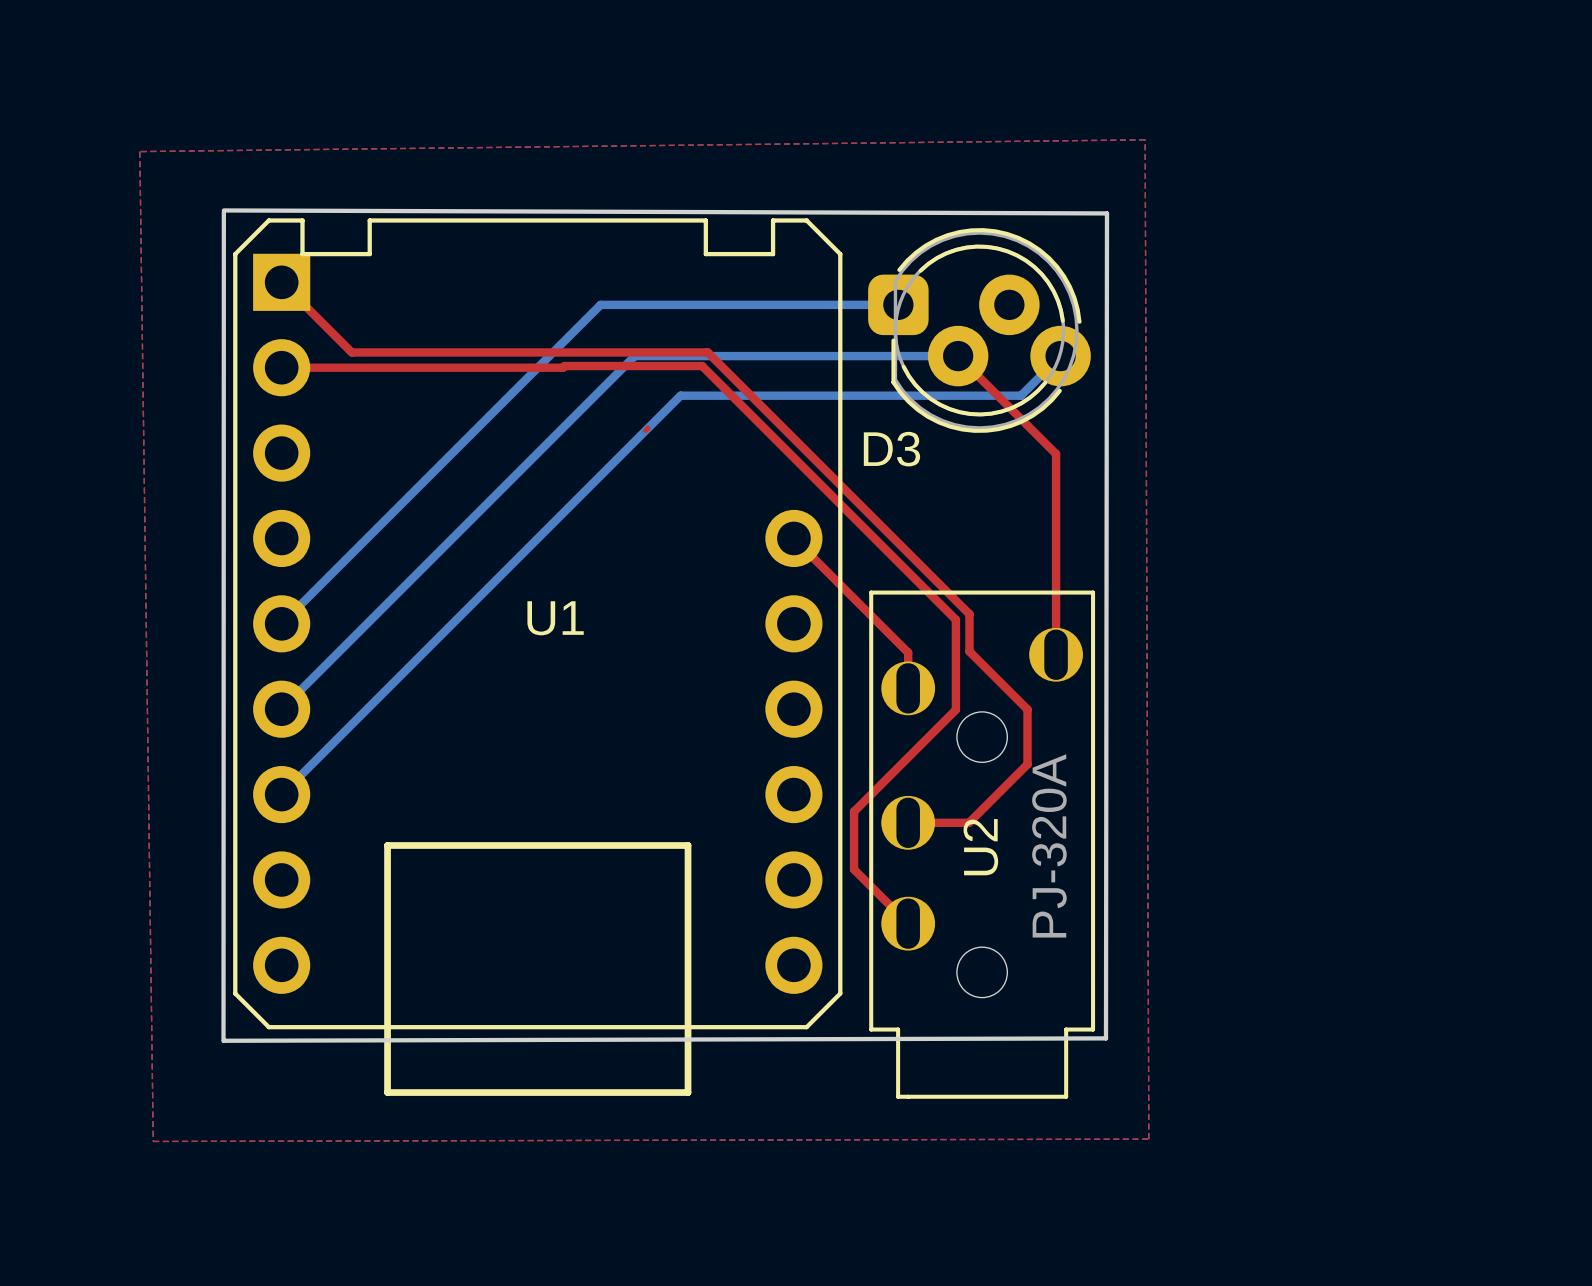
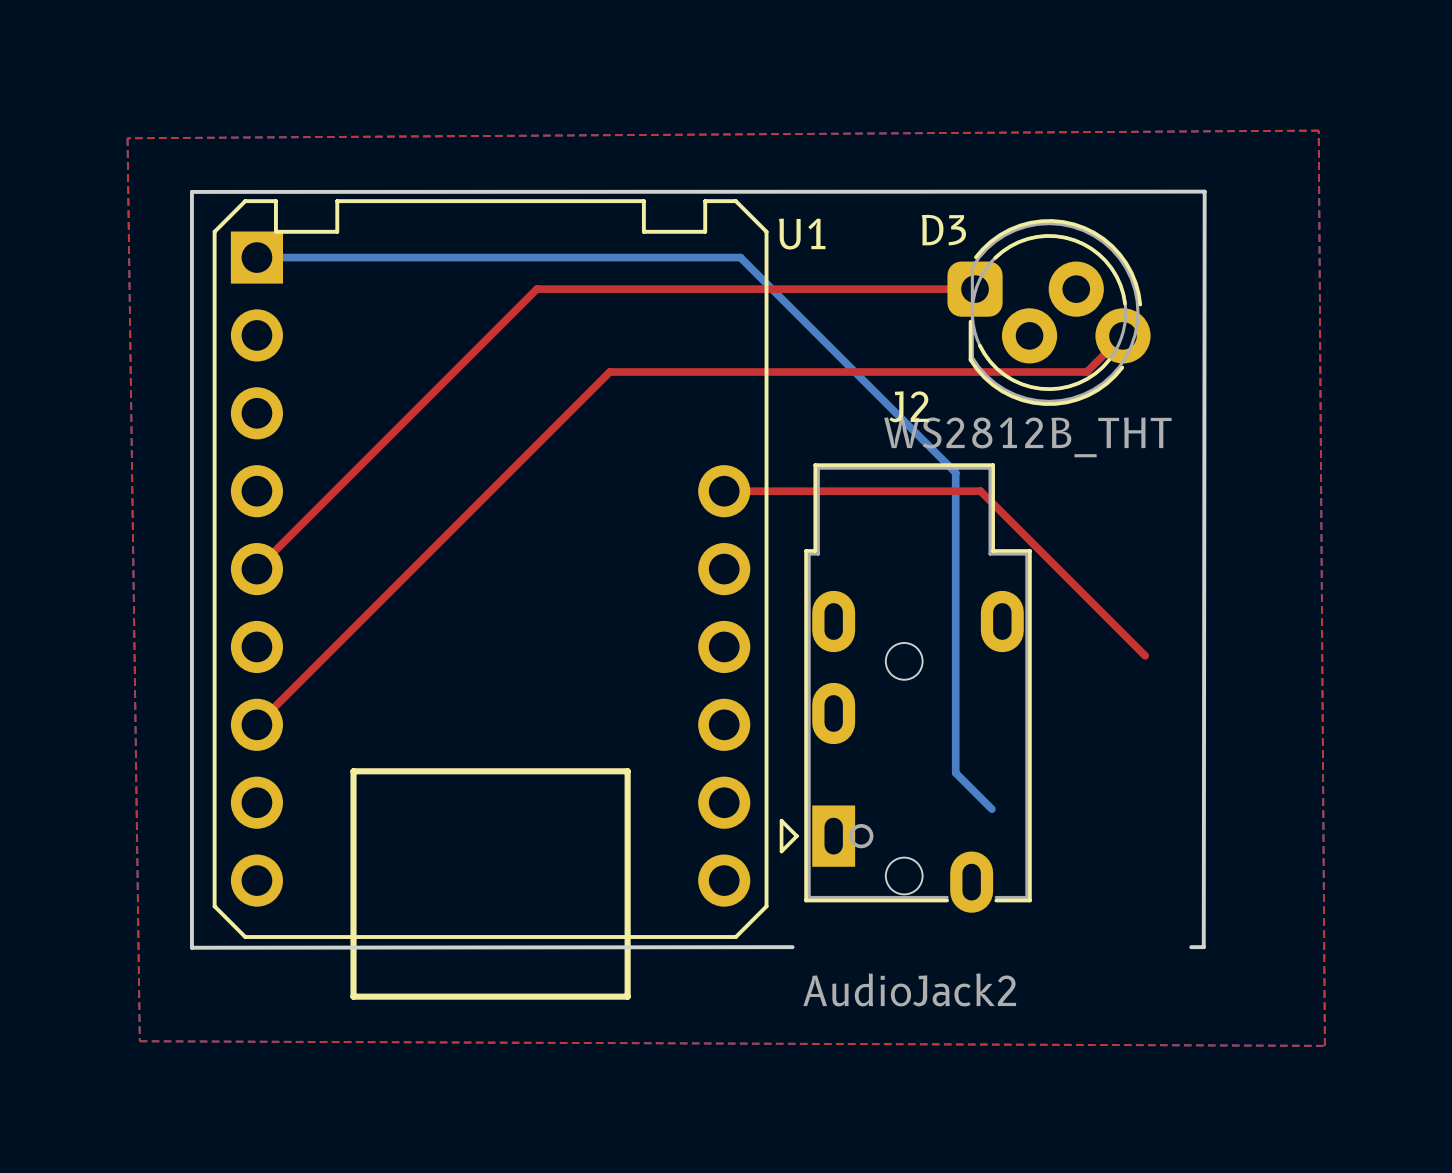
top zone outline: (139, 151) (1145, 139) (1148, 1139) (153, 1141) -> (127, 138) (1318, 130) (1324, 1045) (139, 1041)
board edge: (223, 210) (1107, 213) (1105, 1038) (223, 1040) -> none
board edge: (223, 212) (223, 1040) -> none
top track: (281, 282) (351, 352) (707, 352) (969, 614) (969, 651) (1027, 709) (1027, 764) (969, 822) (908, 822) -> none
bottom track: none -> (256, 257) (740, 257) (955, 472) (955, 772) (991, 809)
bottom track: (898, 304) (600, 304) (281, 623) -> none
top track: none -> (975, 289) (536, 289) (256, 569)
D3 position: (979, 330) -> (1049, 312)
top track: (958, 356) (1056, 454) (1056, 654) -> none
bottom track: (958, 356) (634, 356) (281, 709) -> none
bottom track: (1060, 356) (1020, 395) (680, 395) (281, 794) -> none
top track: (281, 367) (702, 366) (955, 619) (955, 709) (854, 811) (854, 869) (908, 923) -> none
top track: none -> (1123, 335) (1086, 371) (609, 371) (256, 724)
D3 name position: D3 (891, 449) -> D3 (943, 230)
D3 value: none -> WS2812B_THT (1027, 437)
top track: (793, 538) (908, 652) (908, 688) -> (724, 491) (980, 491) (1145, 655)
U1 name position: U1 (555, 618) -> U1 (802, 234)
J2: none -> AudioJack2 (905, 688)
U2: PJ-320A (982, 844) -> none
board edge: none -> (792, 947) (191, 947) (191, 191) (1204, 191) (1203, 947) (1191, 947)

